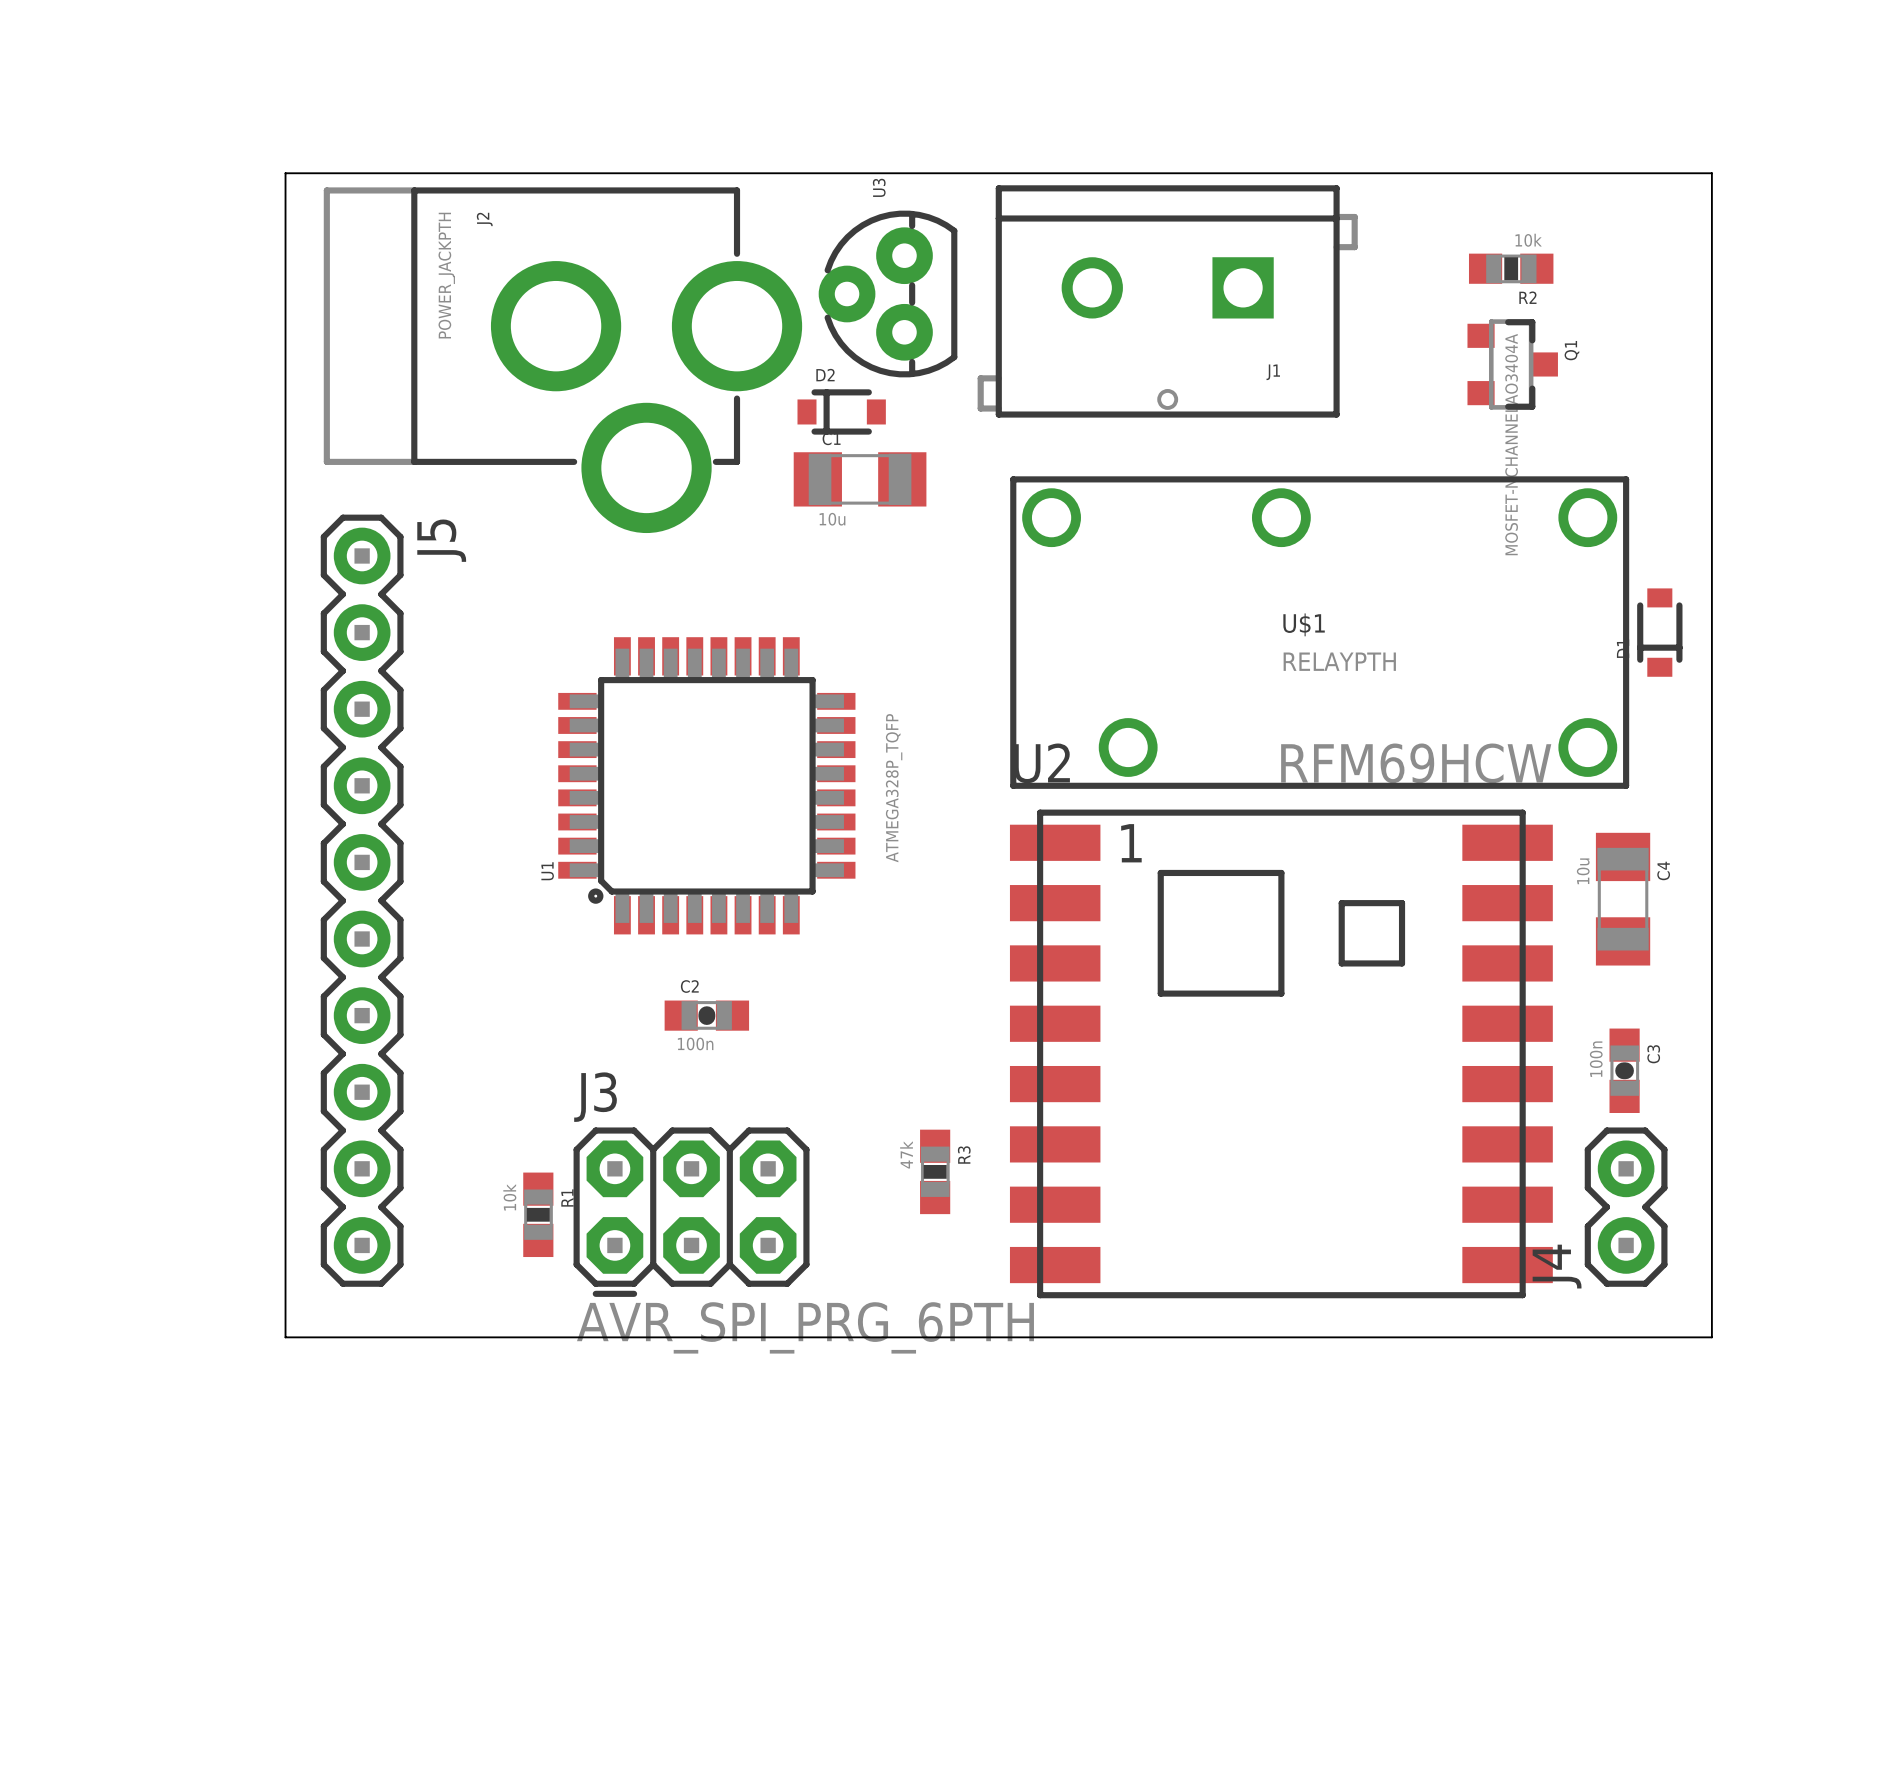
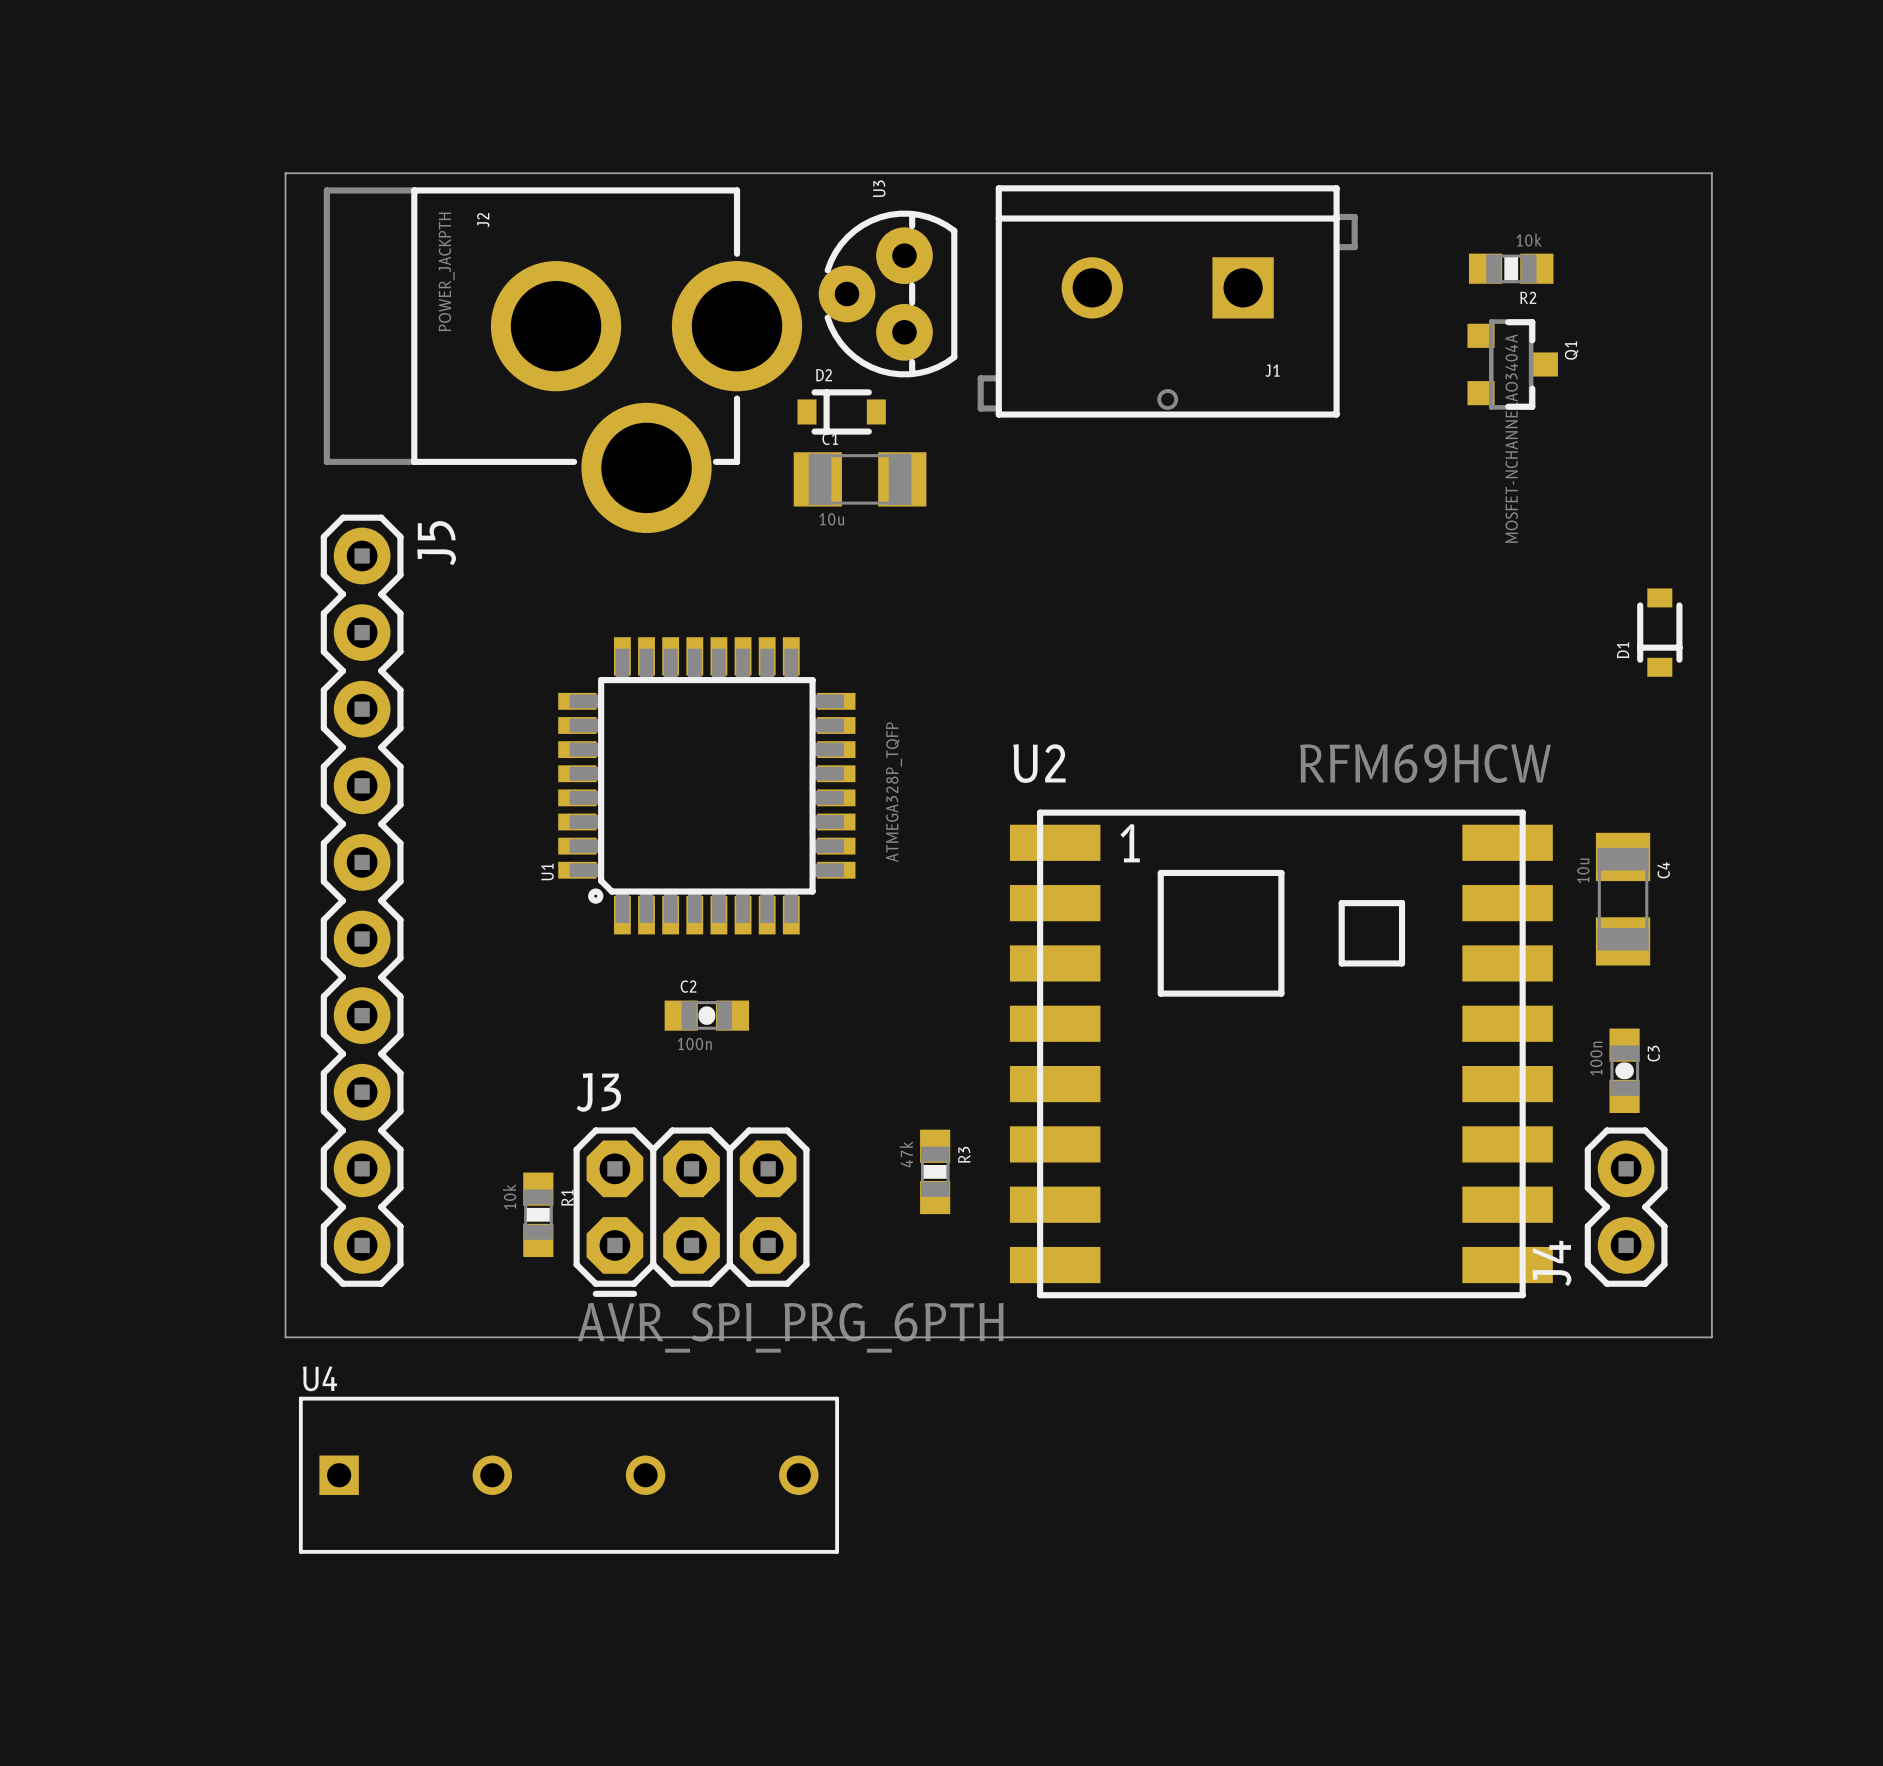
U$1: RELAYPTH (1319, 632) -> none
U4: none -> (568, 1475)

